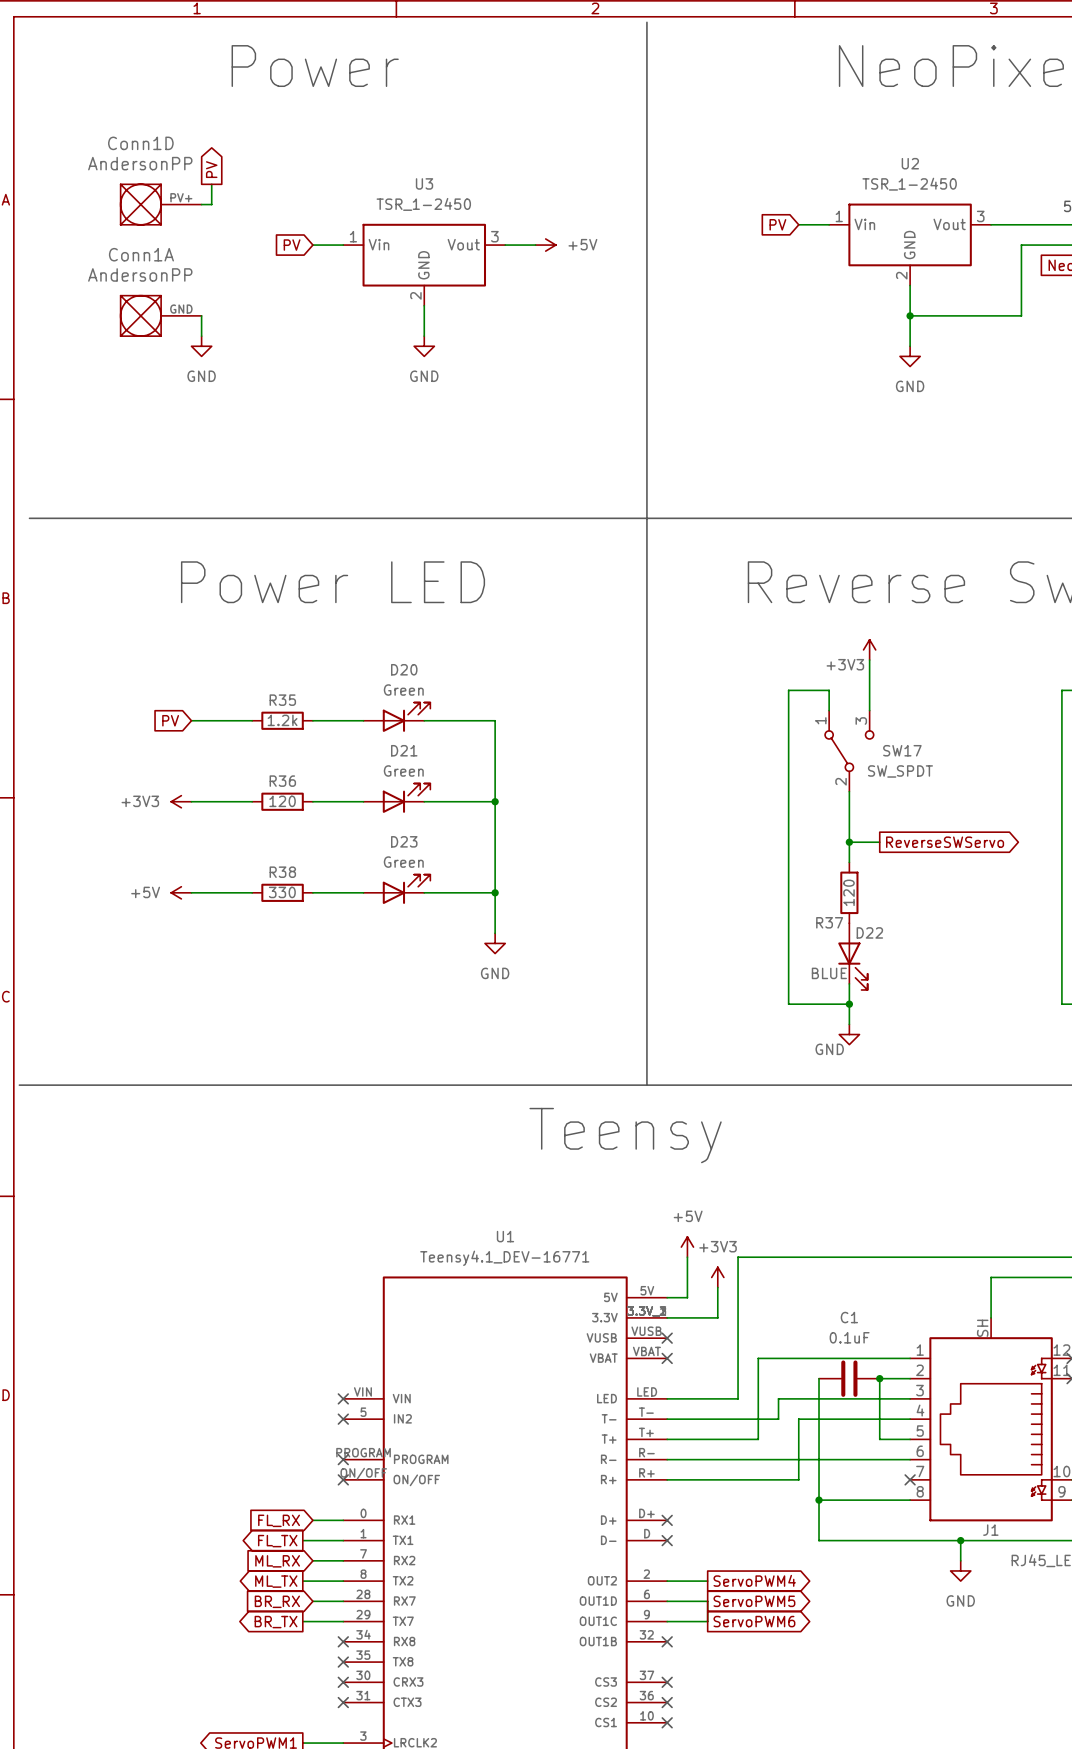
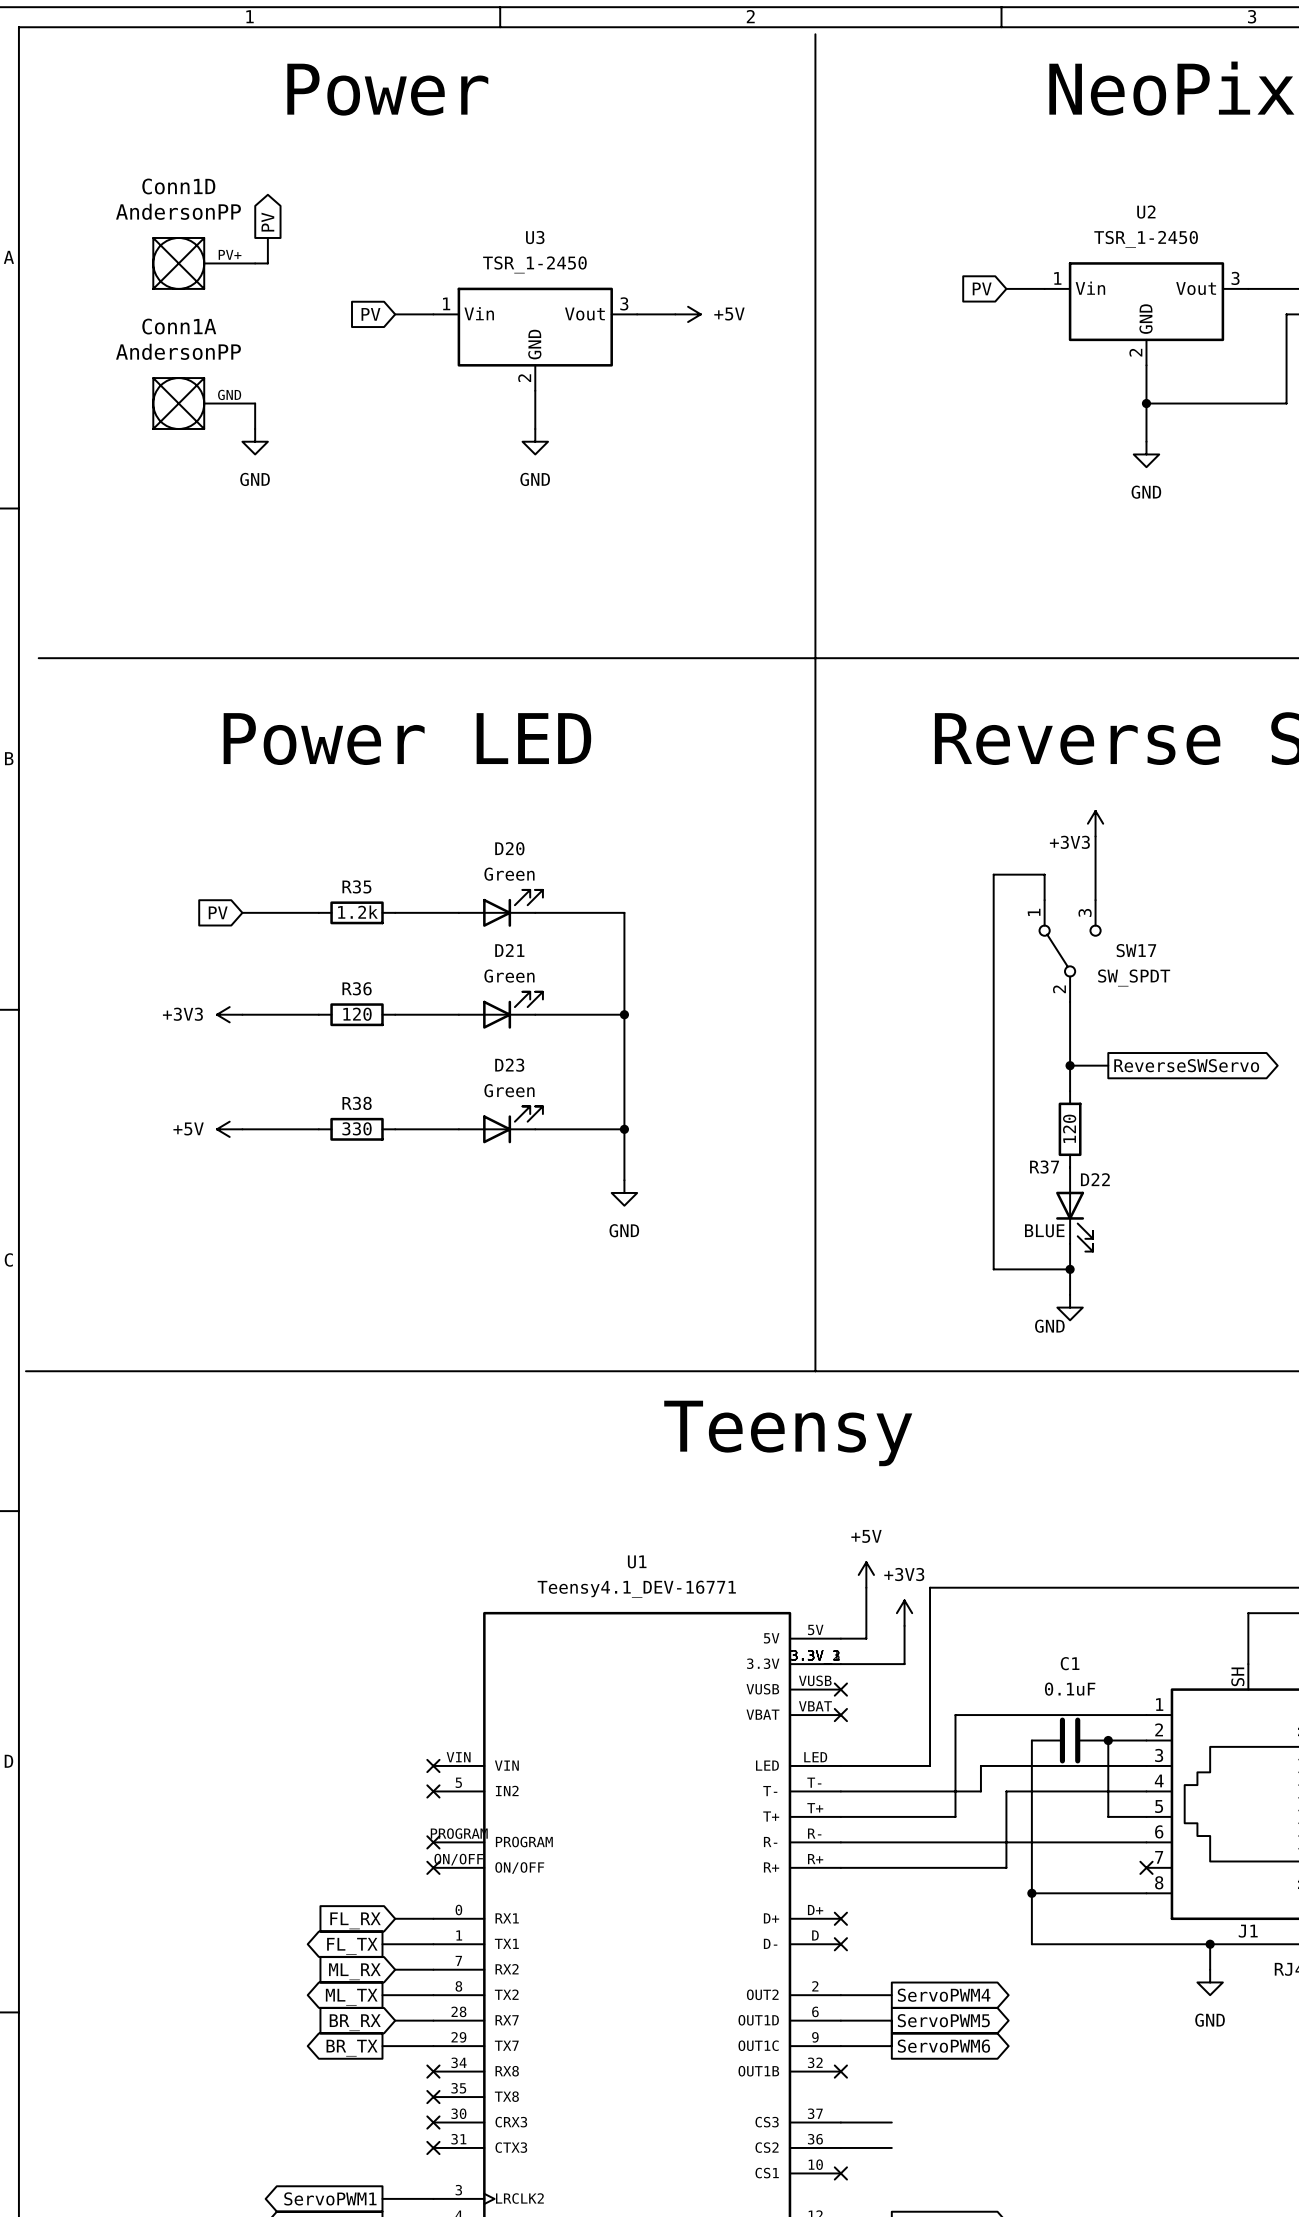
wire: none -> (840, 2122) (891, 2122)
no-connect mark: (667, 1682) -> none
wire: none -> (840, 2147) (891, 2147)
no-connect mark: (667, 1702) -> none

